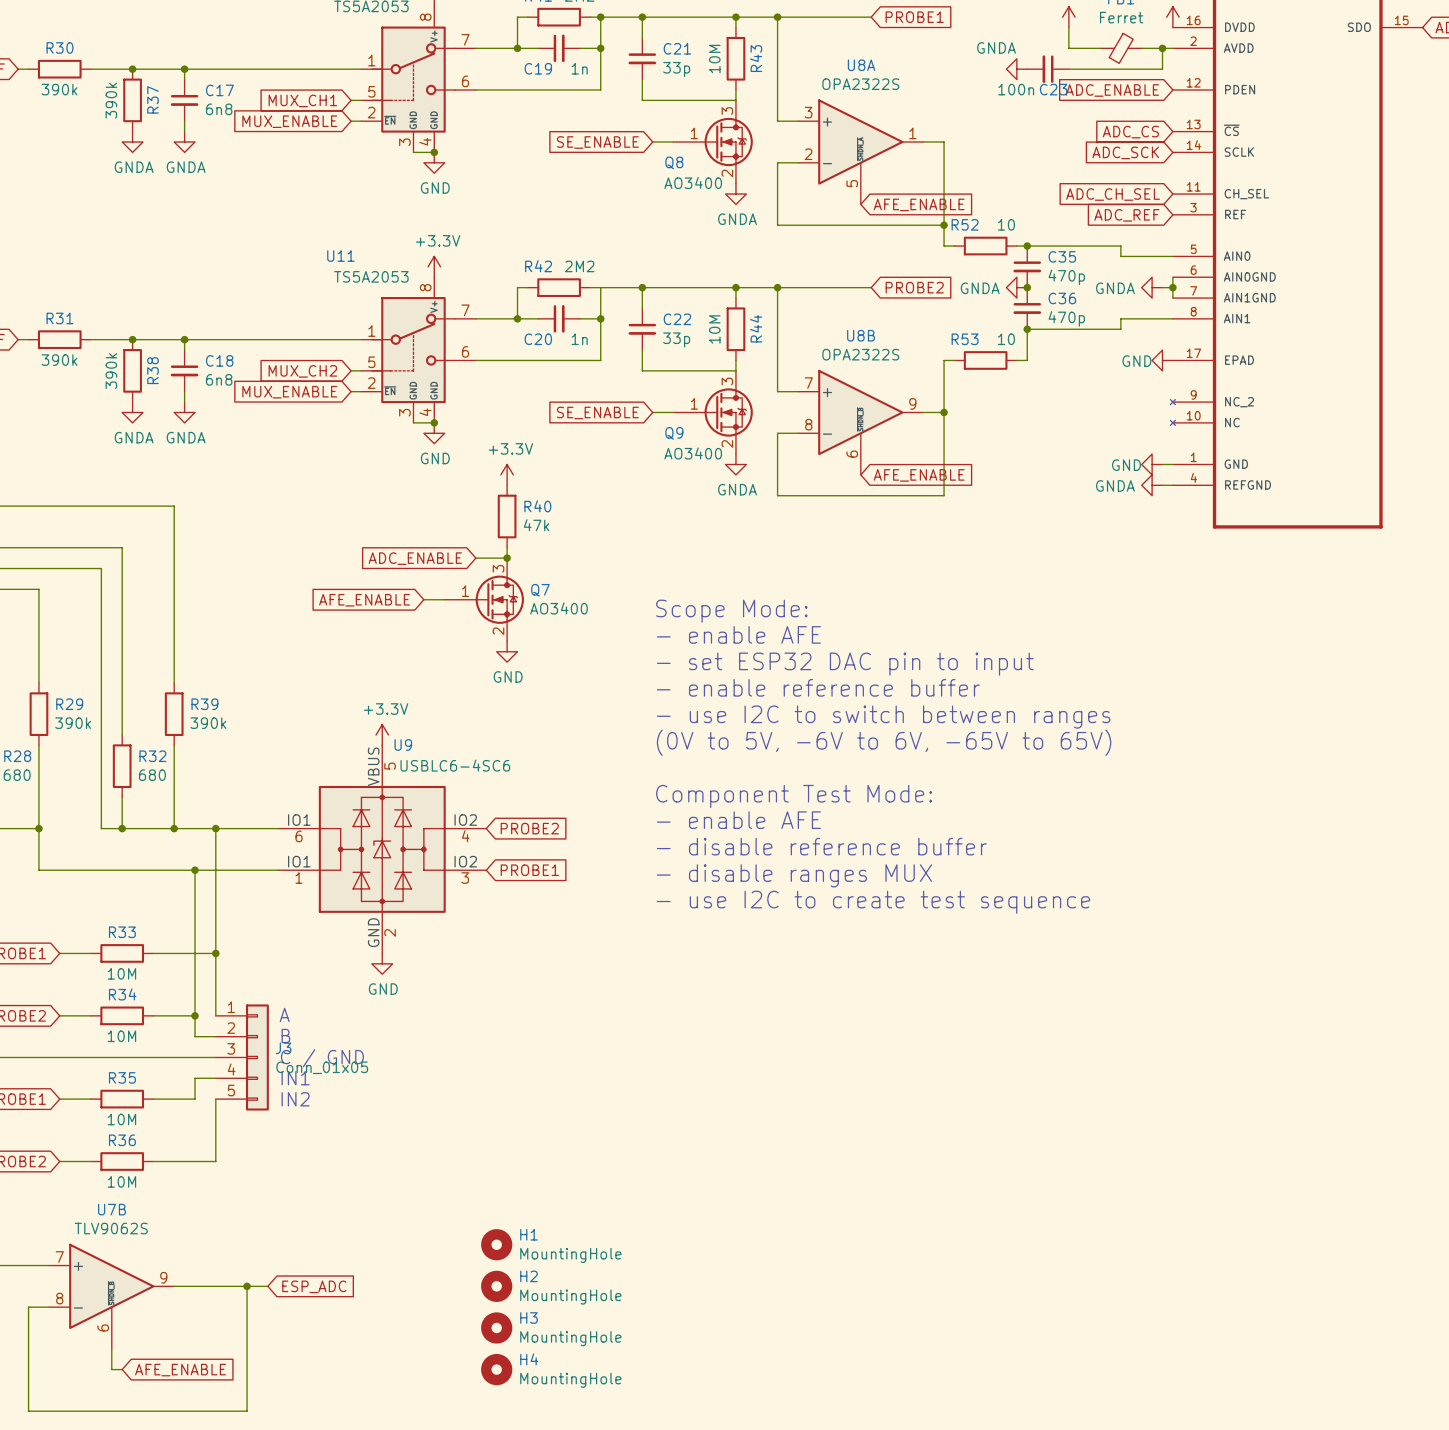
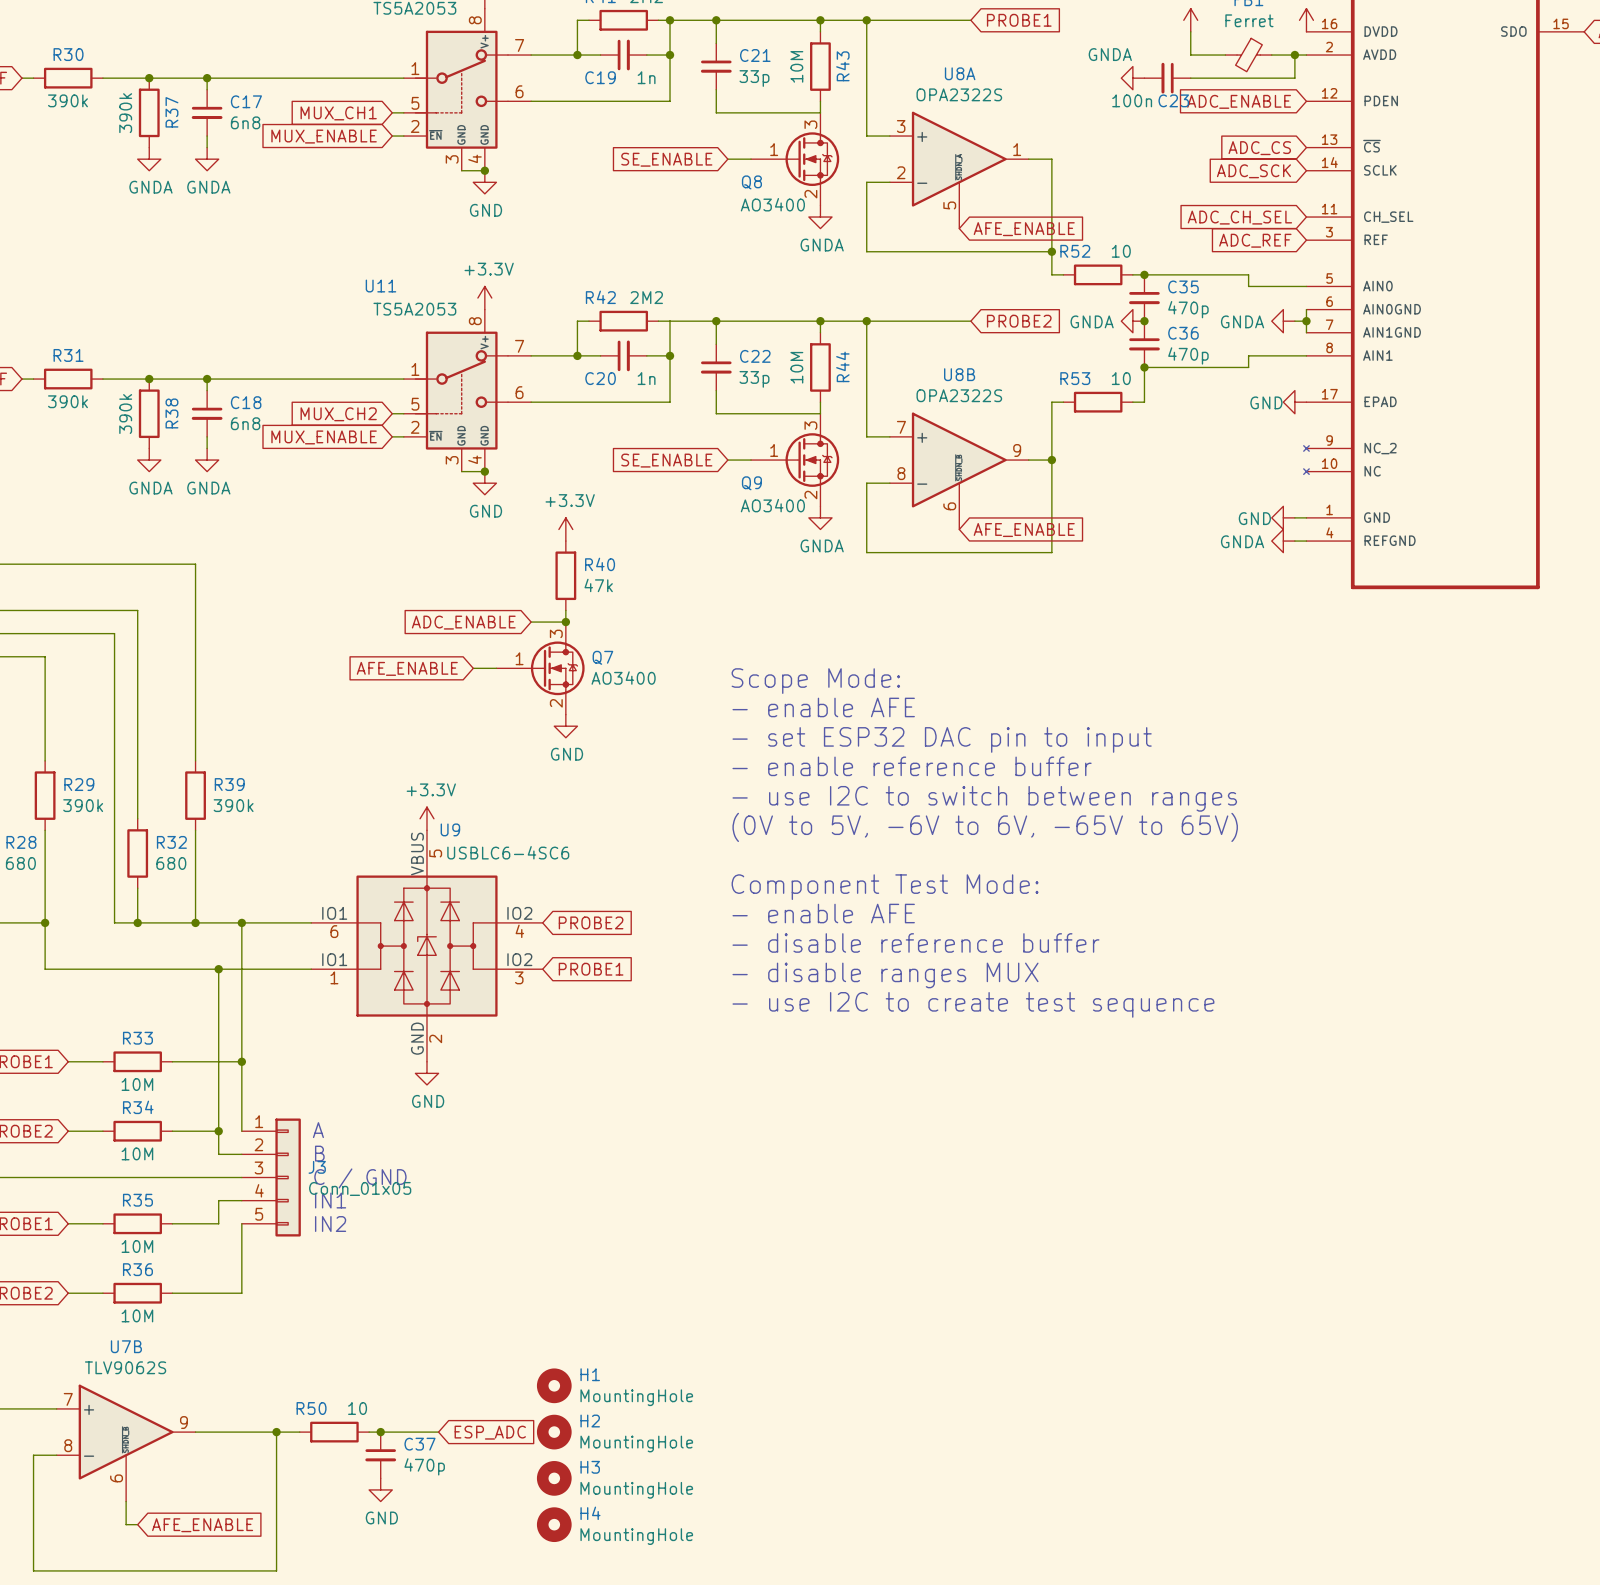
R50: none -> 10 (334, 1432)
global label position: ESP_ADC (314, 1286) -> ESP_ADC (490, 1432)
wire: none -> (369, 1432) (438, 1432)
junction: none -> (380, 1432)
C37: none -> 470p (380, 1455)
power symbol: none -> GND (380, 1489)

